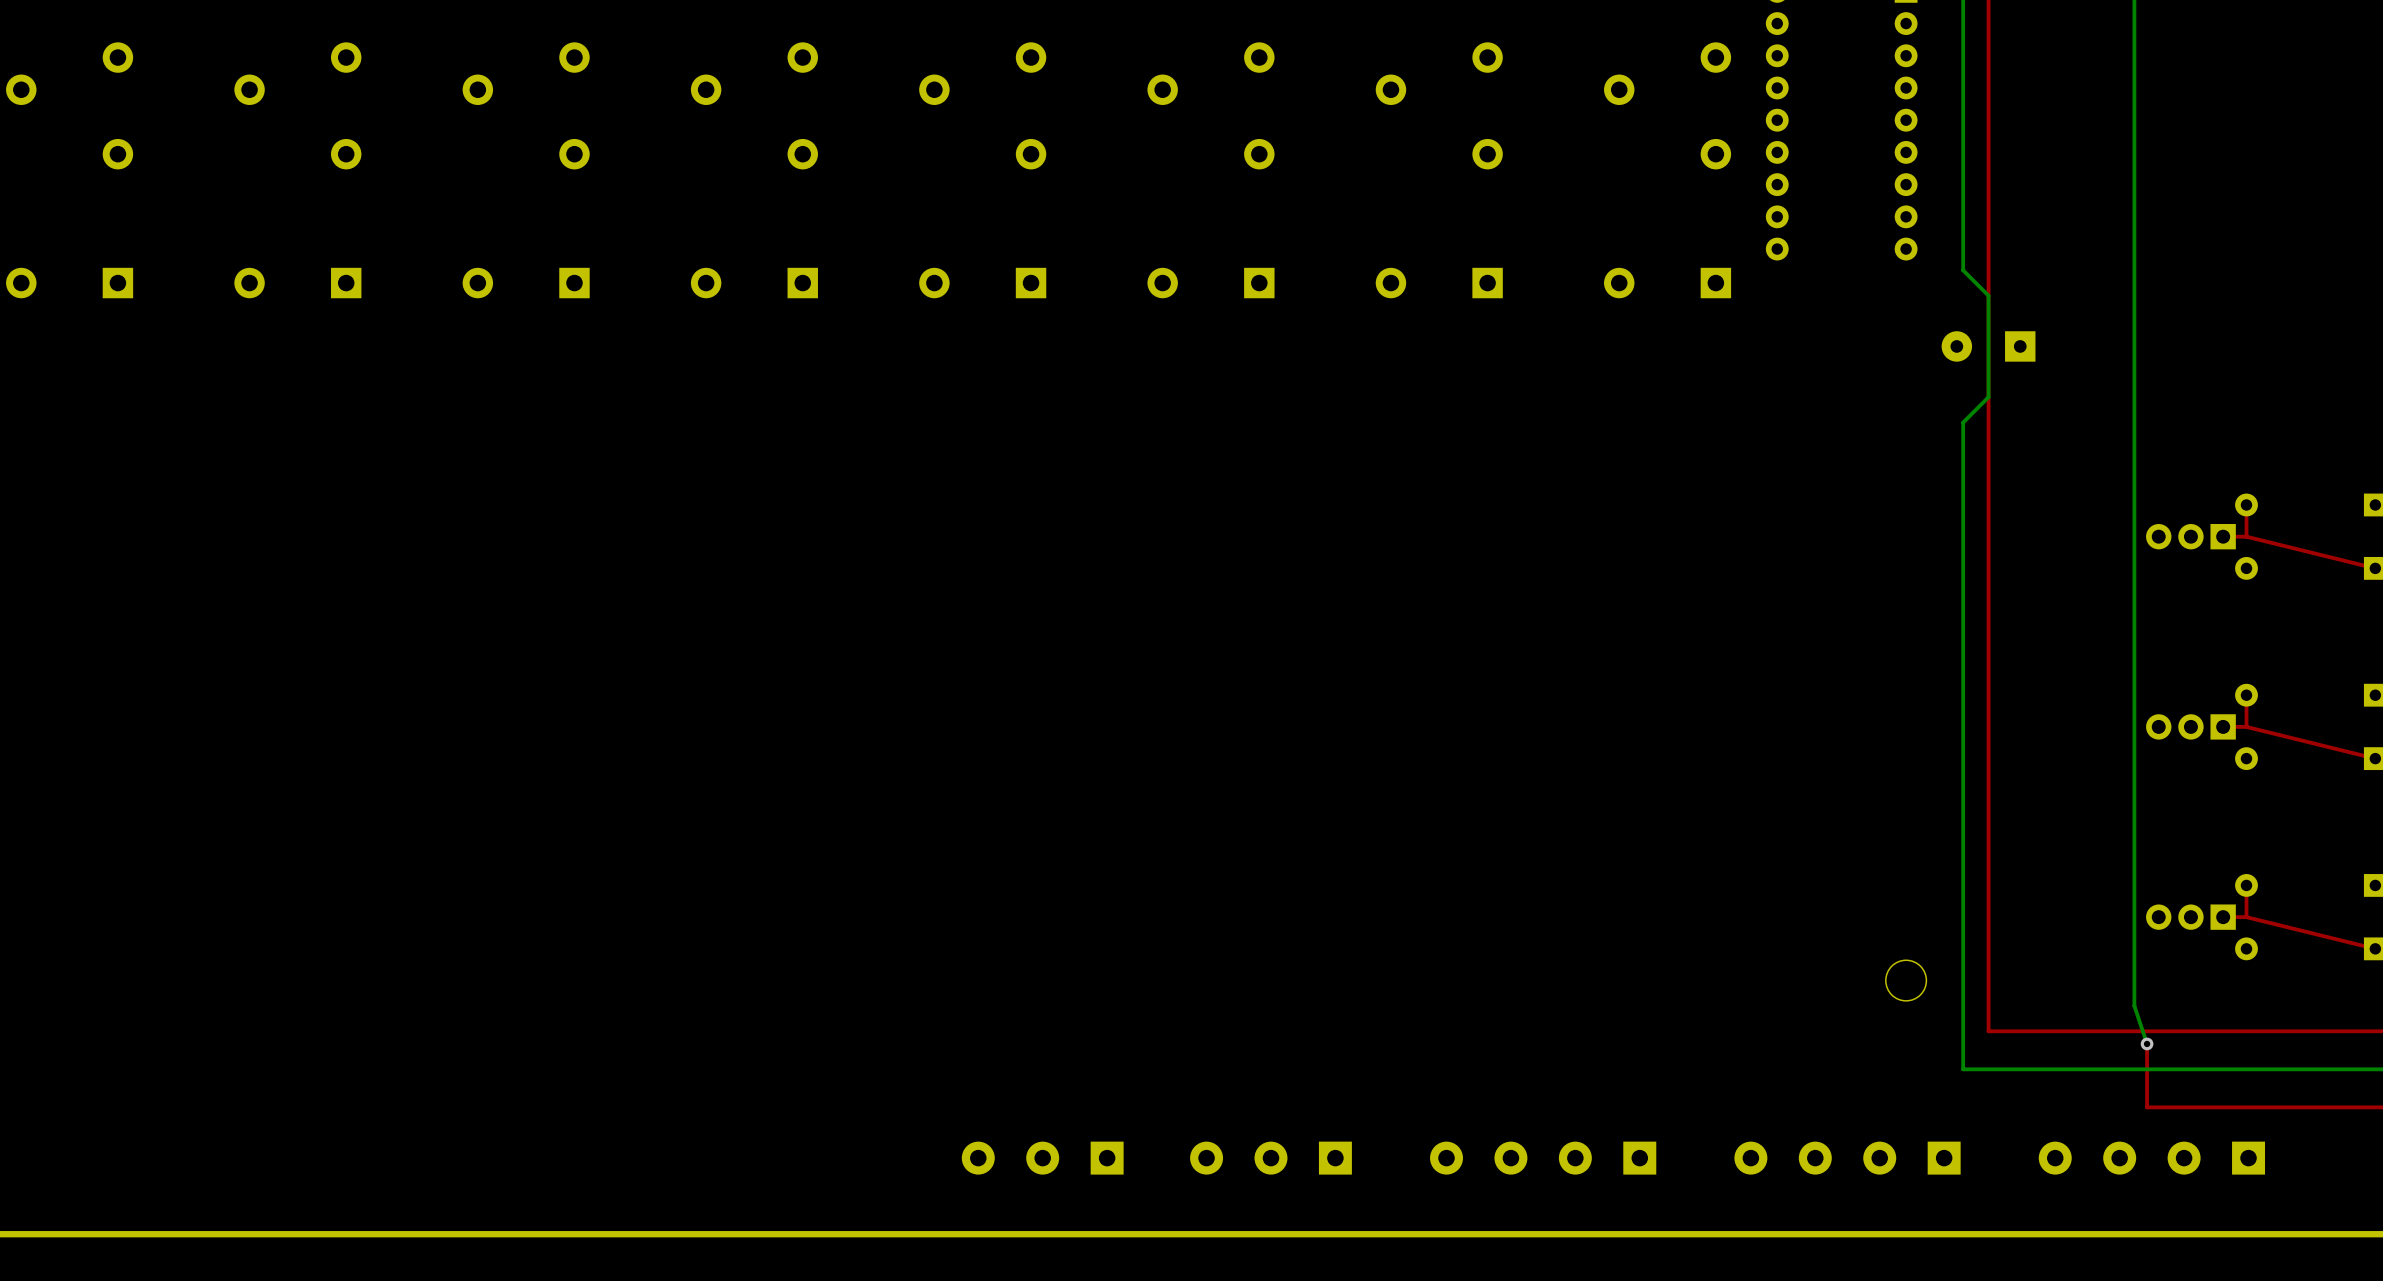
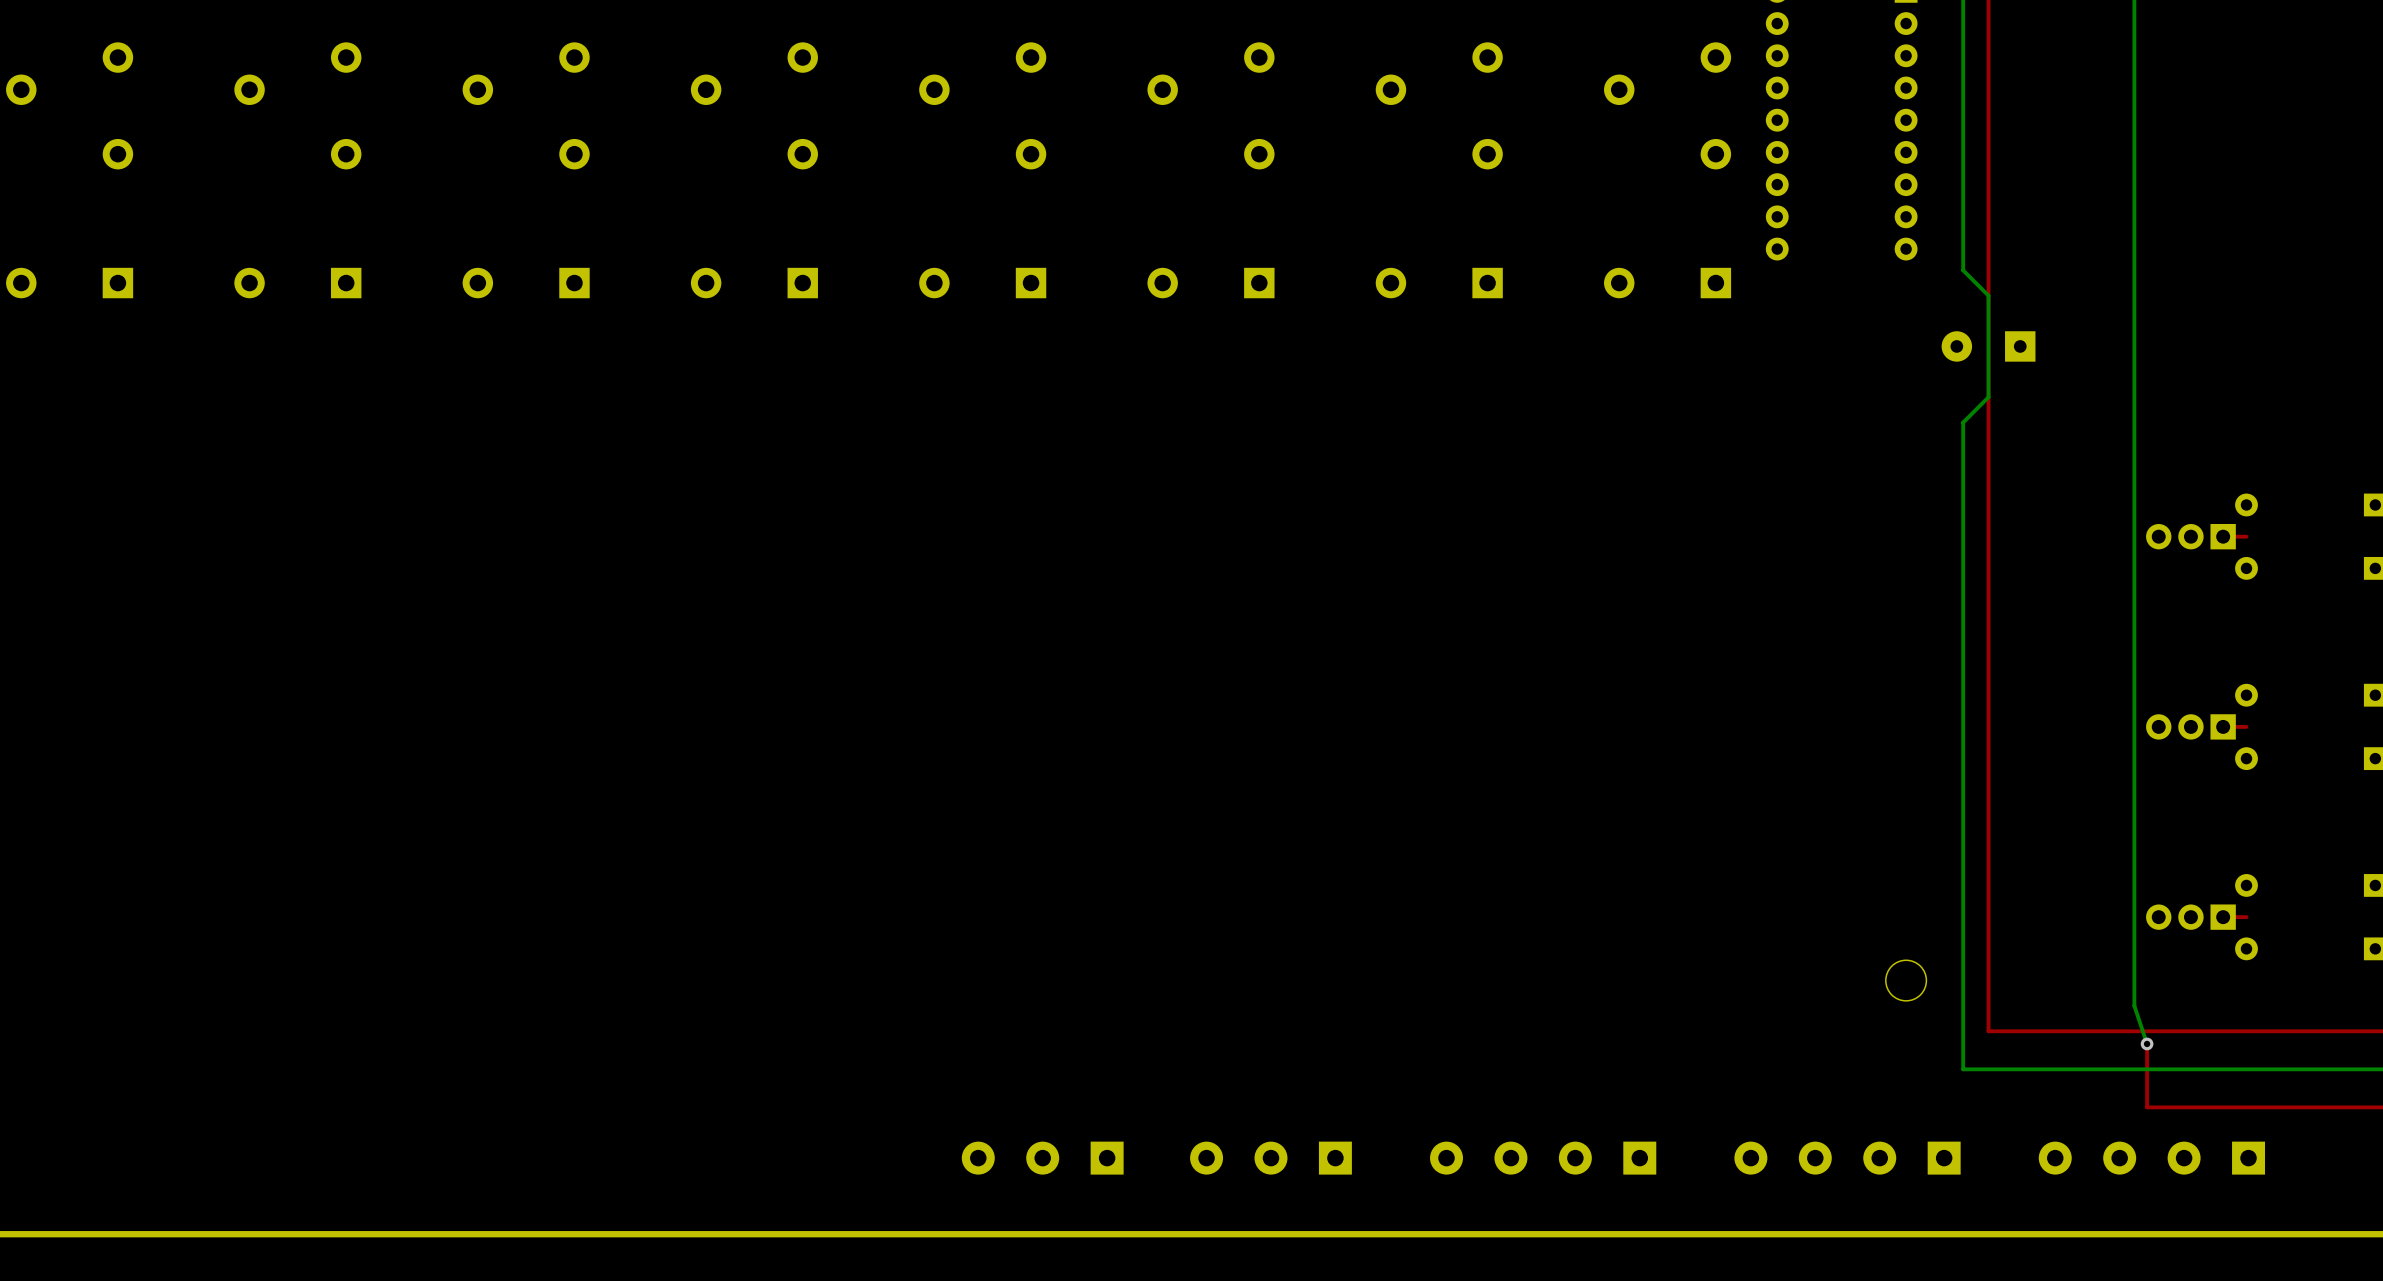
top track: (2246, 504) (2246, 536) (2375, 568) -> none
top track: (2246, 695) (2246, 726) (2375, 758) -> none
top track: (2246, 885) (2246, 917) (2375, 948) -> none

